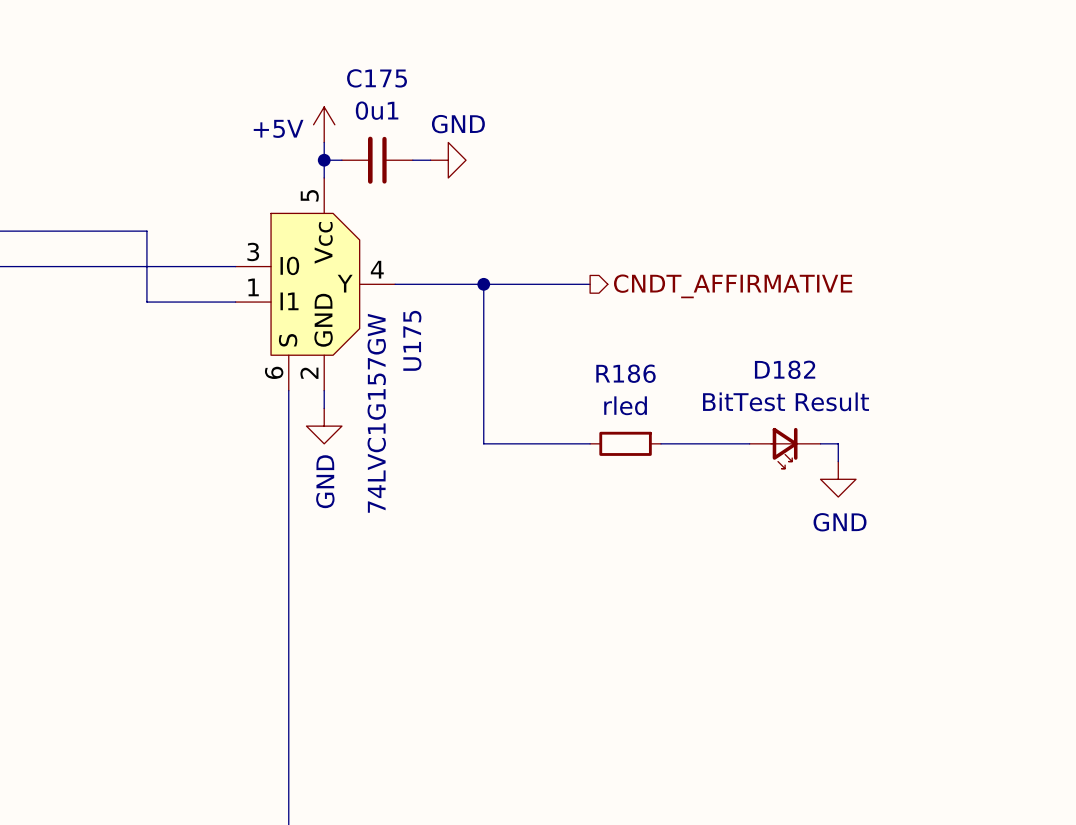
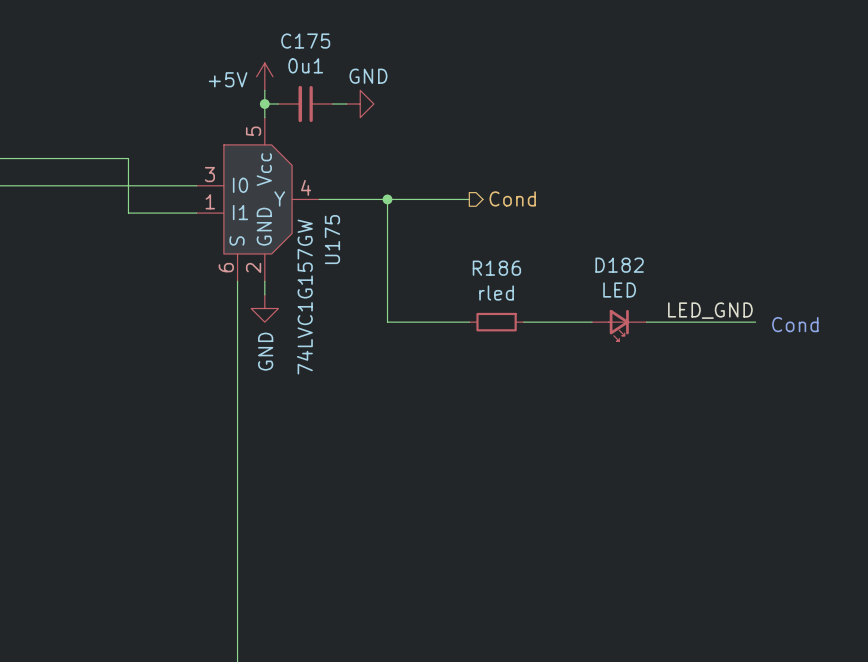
hierarchical label: CNDT_AFFIRMATIVE (733, 286) -> Cond (512, 198)
D182 value: BitTest Result (786, 401) -> LED (619, 290)
label: none -> LED_GND (710, 310)
wire: (838, 443) (838, 461) -> (660, 322) (755, 322)
text: none -> Cond (795, 324)
power symbol: GND (838, 479) -> none

